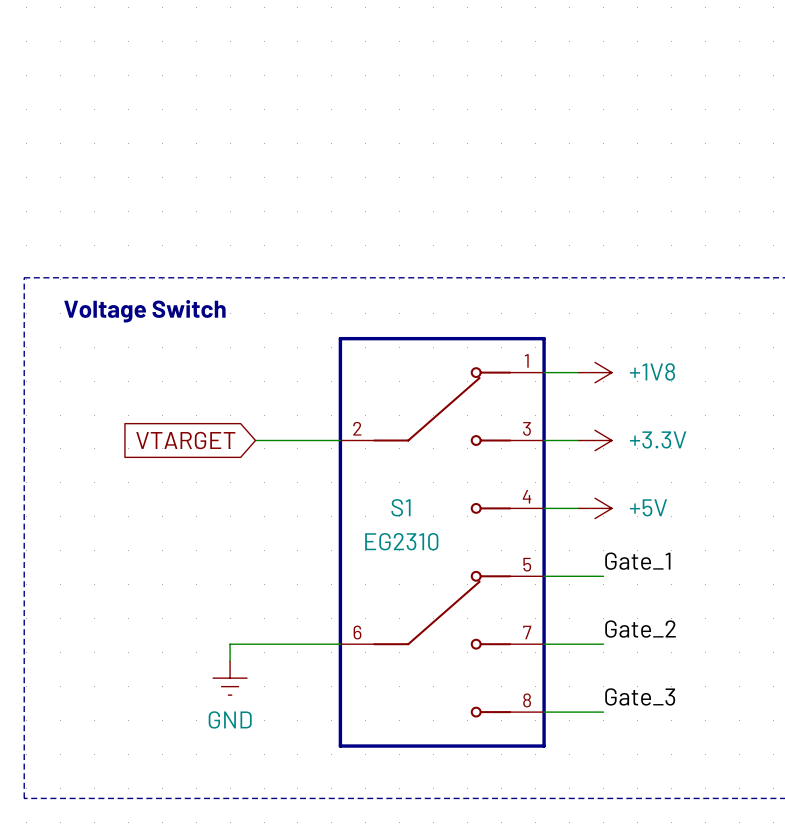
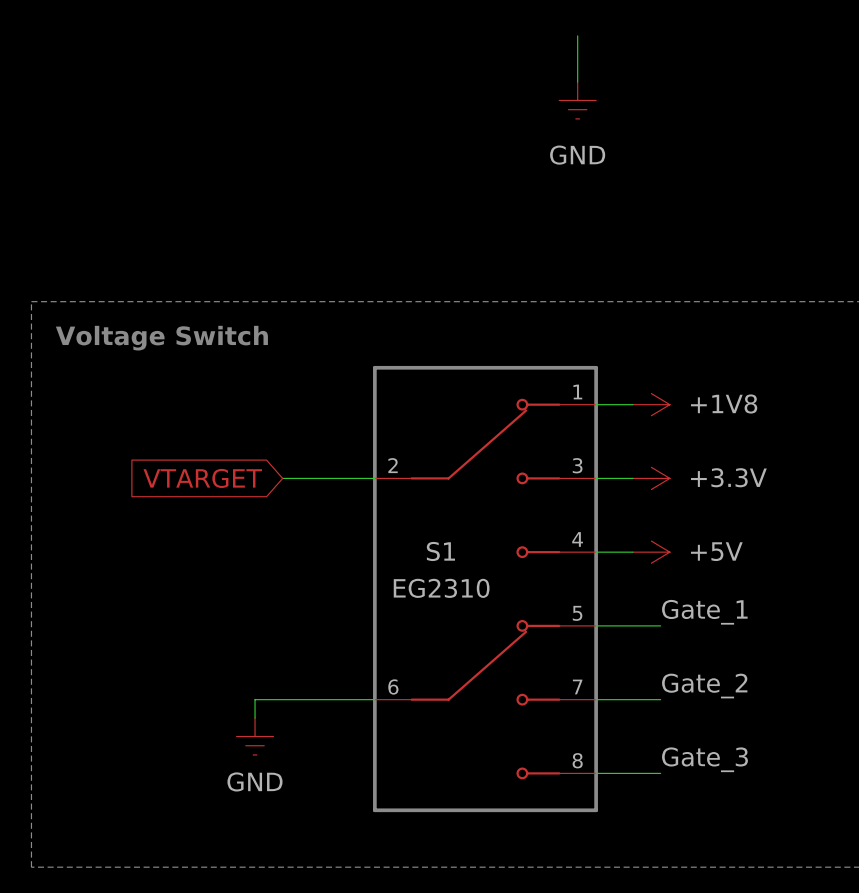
wire: none -> (577, 35) (577, 82)
power symbol: none -> GND (577, 100)

